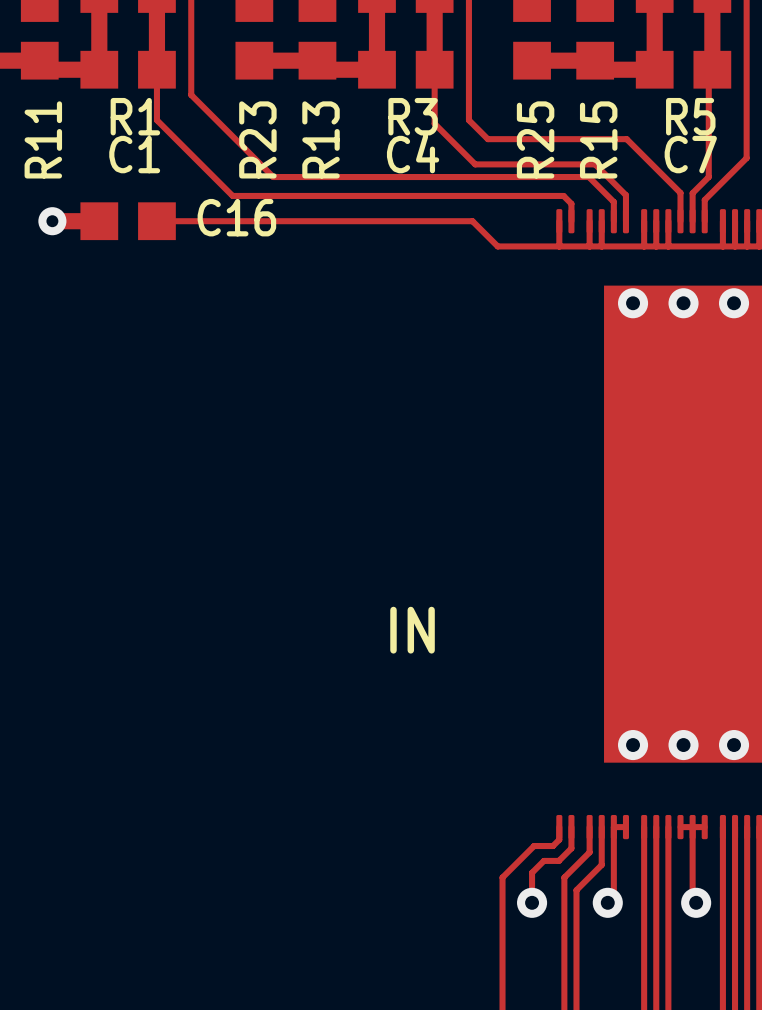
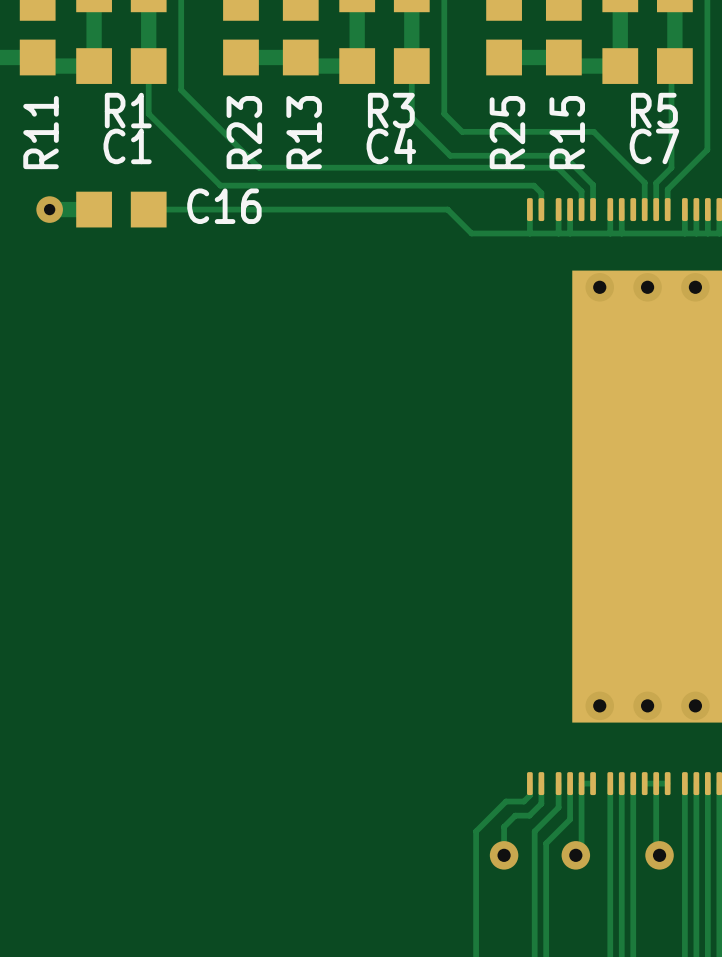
track: (668, 221) (668, 246) -> none
text: IN (412, 630) -> none

